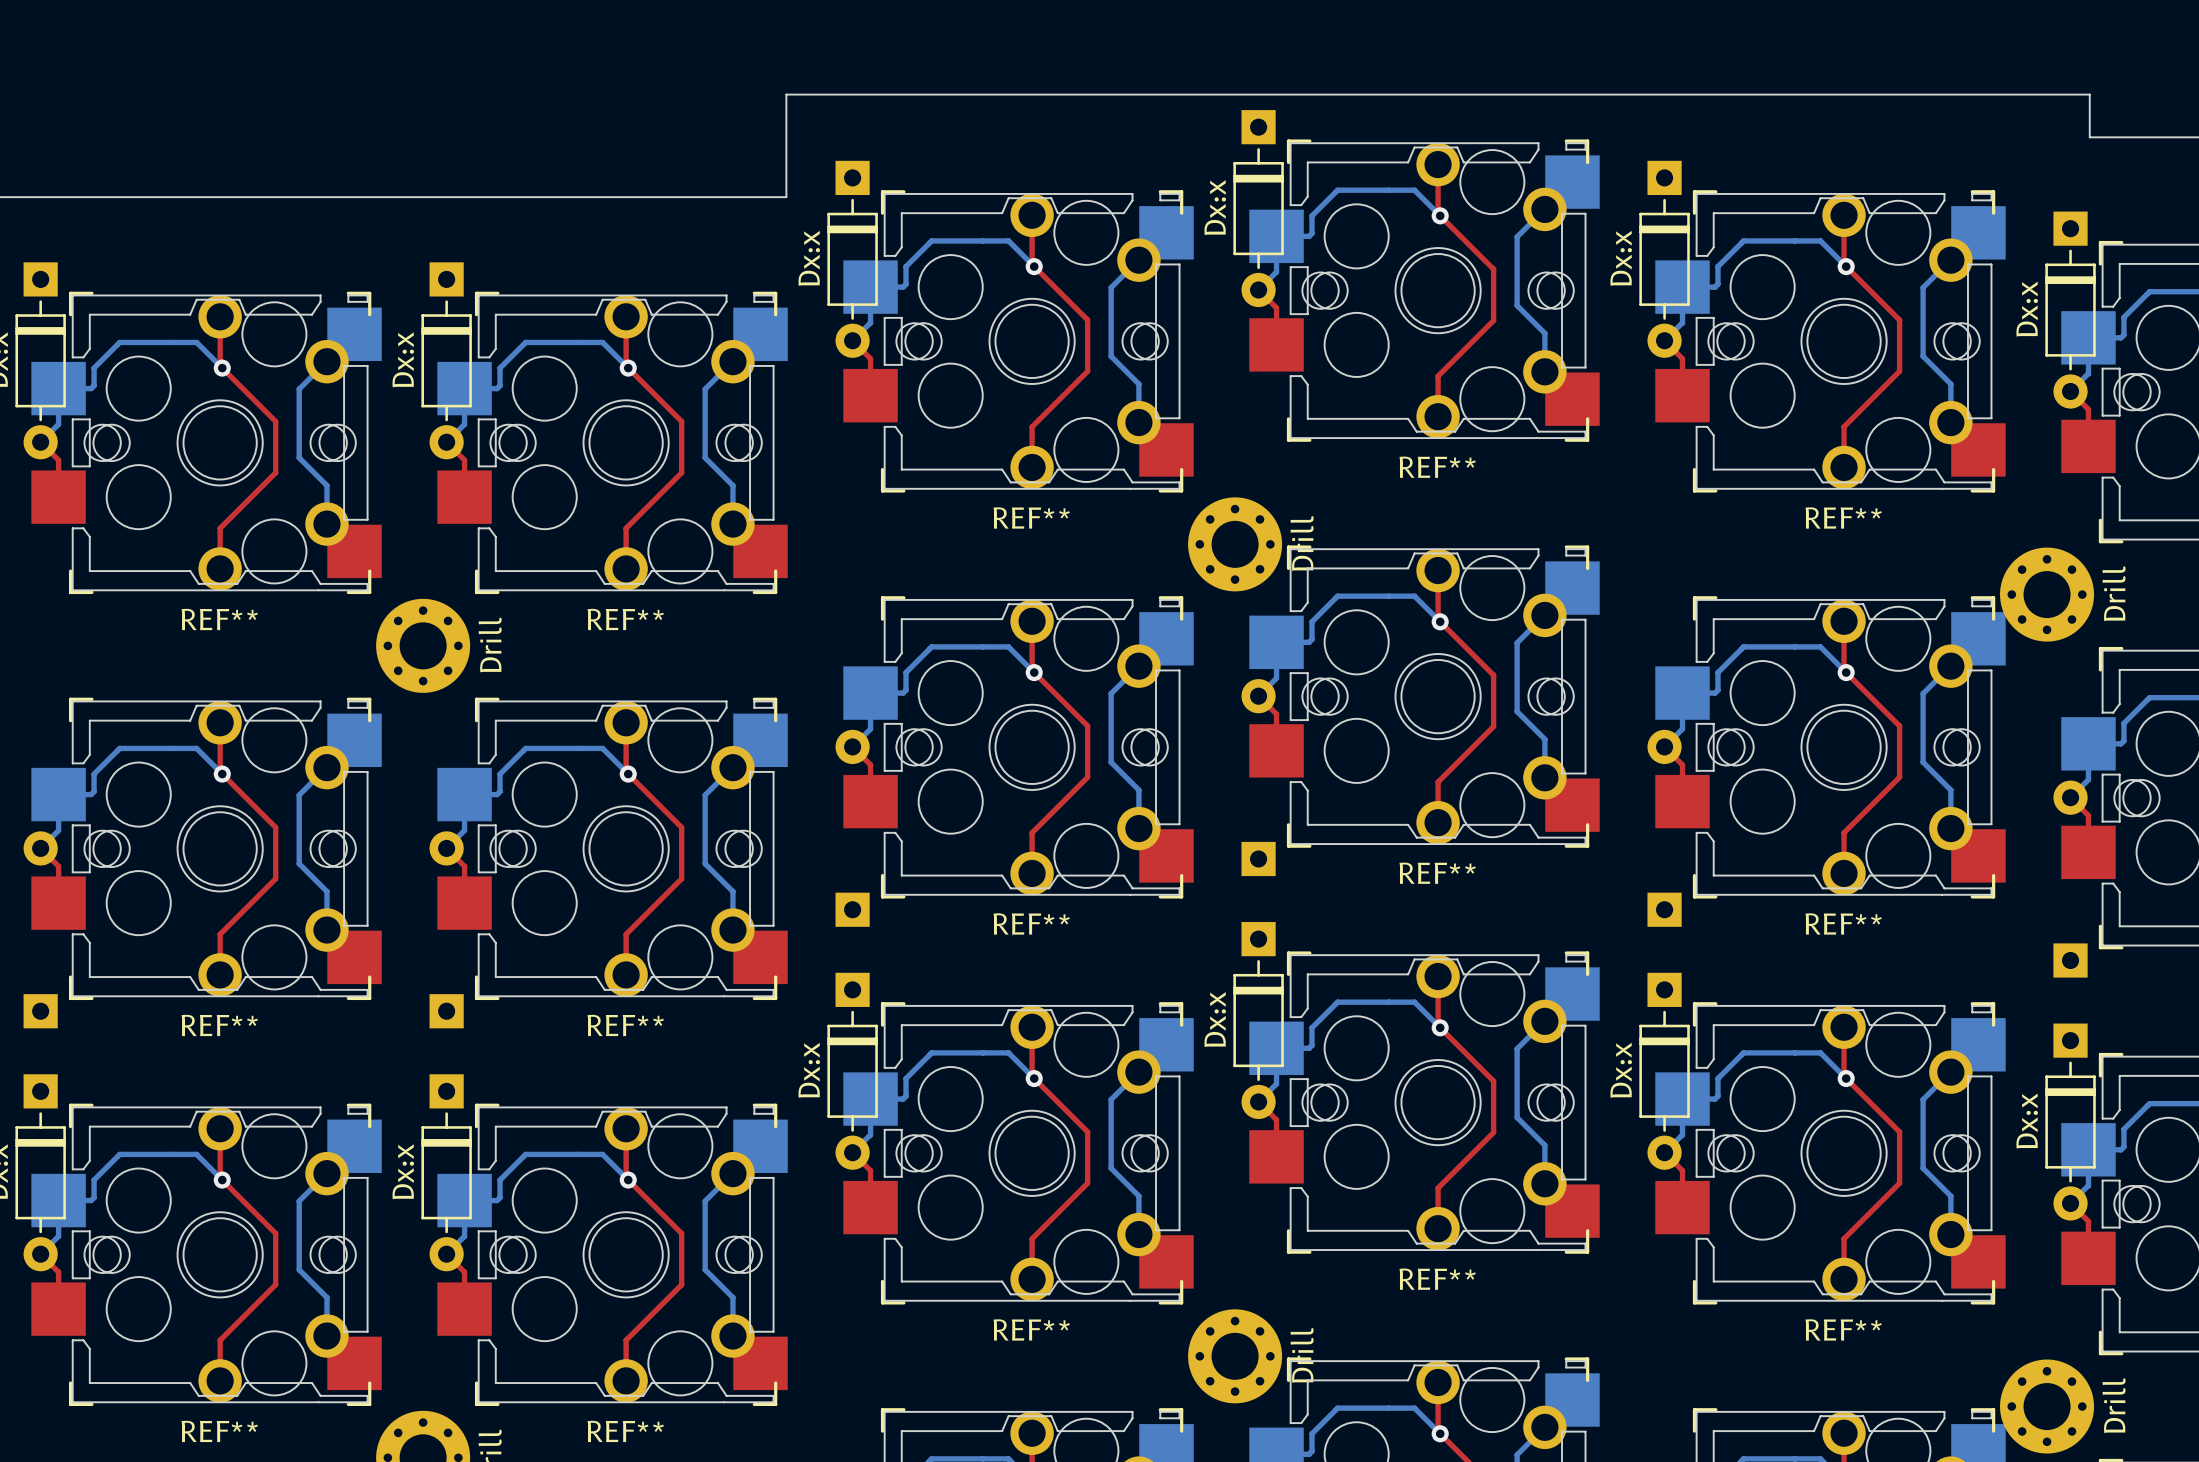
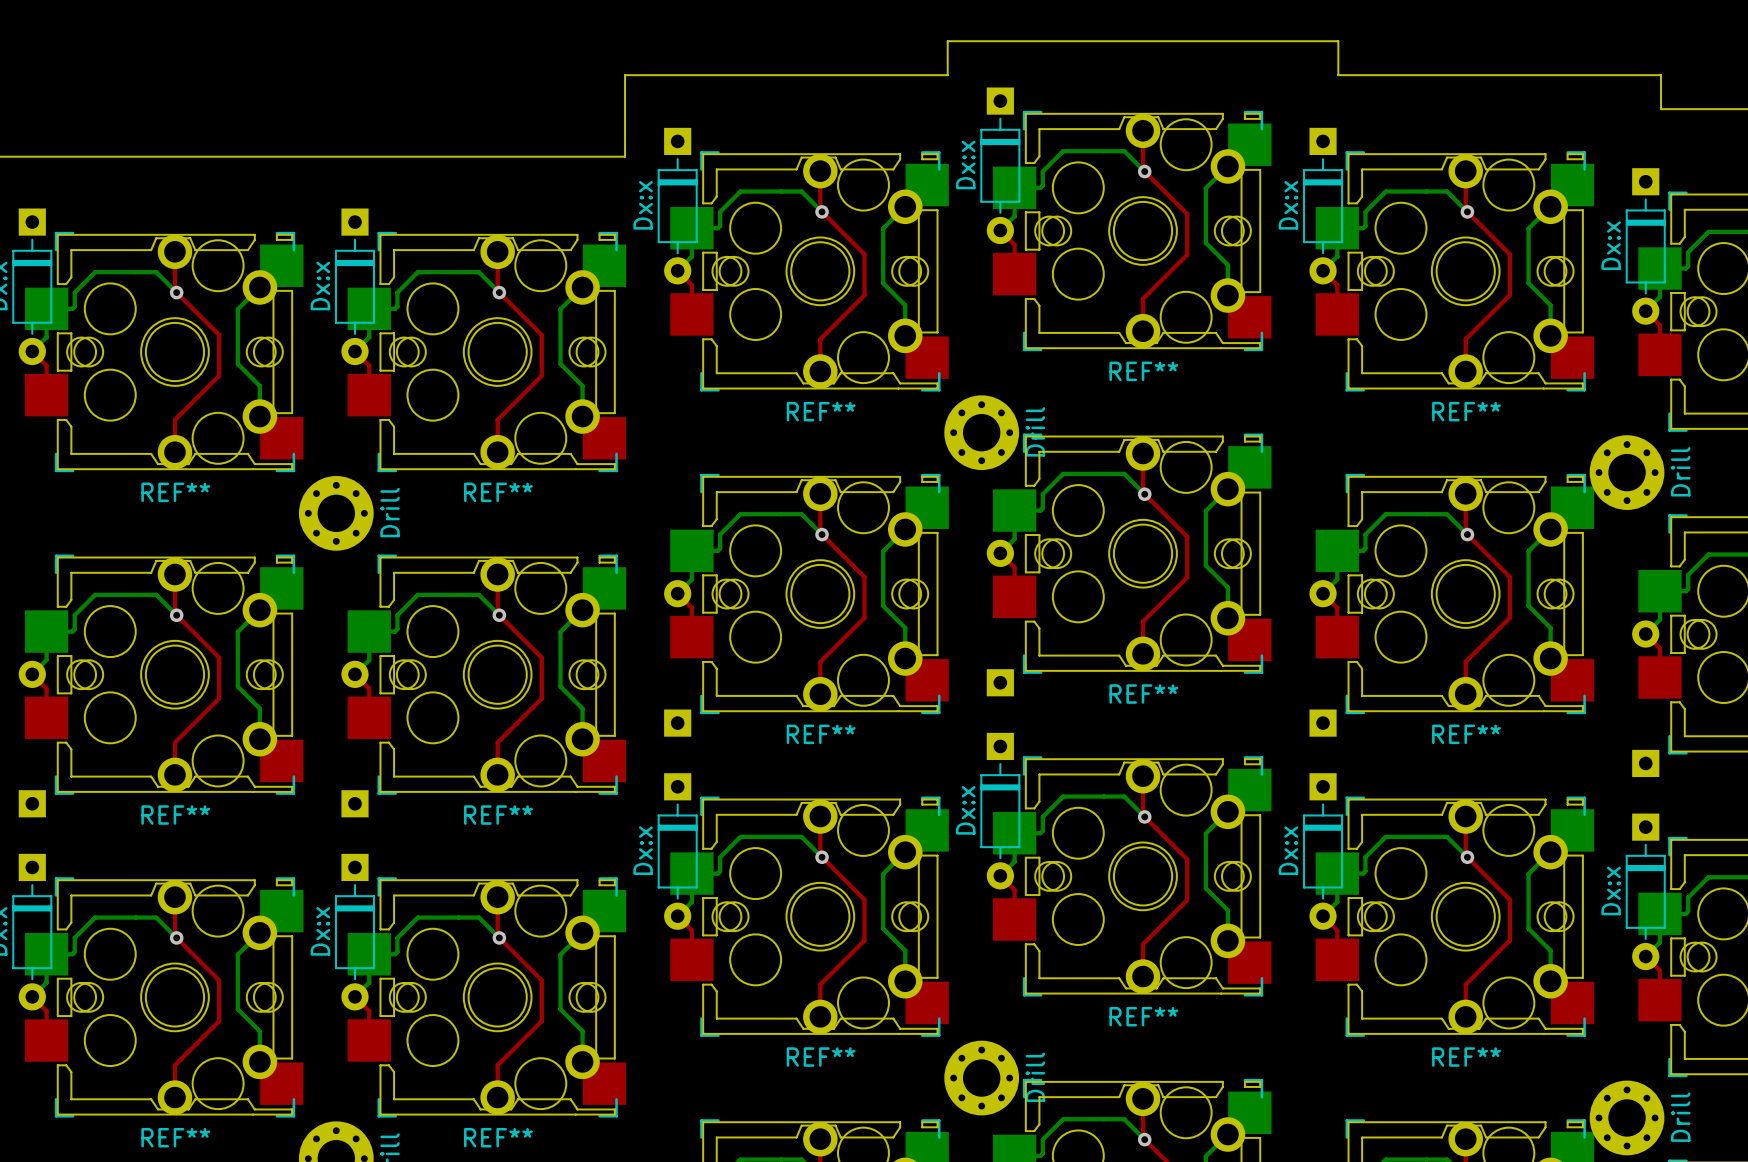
board edge: (1192, 94) (1683, 94) -> (947, 75) (947, 41) (1338, 41) (1338, 75)

